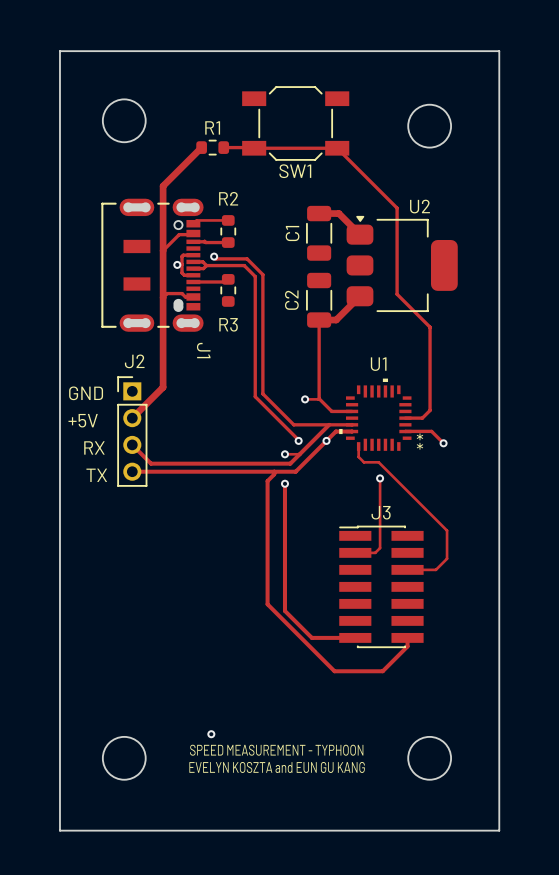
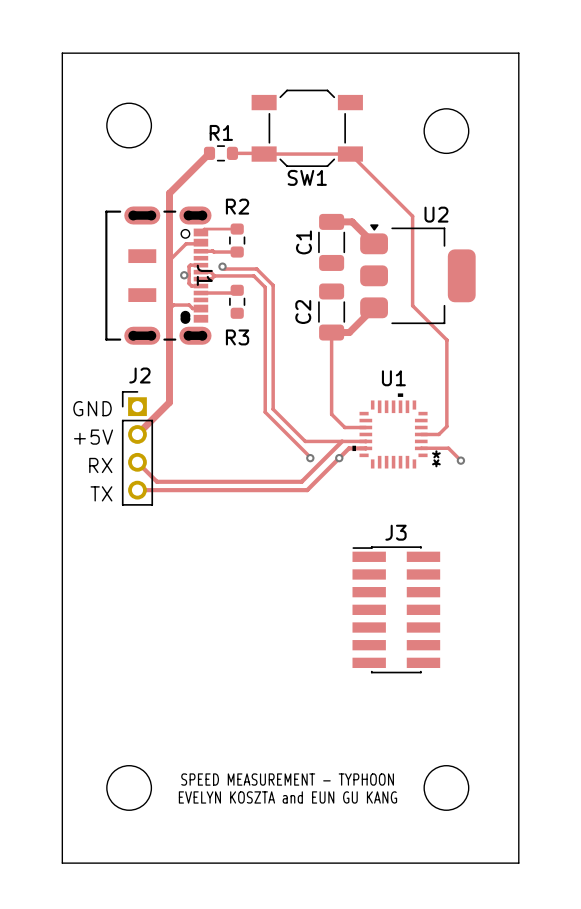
J1 name position: J1 (203, 350) -> J1 (204, 275)
track: (319, 398) (305, 399) -> none
via: (305, 399) -> none
track: (358, 446) (358, 456) (364, 462) (378, 462) (447, 530) (447, 558) (435, 569) (407, 569) -> none
track: (284, 454) (299, 454) -> none
via: (284, 454) -> none
track: (274, 471) (274, 474) (267, 481) (267, 604) (334, 671) (382, 671) (407, 646) (407, 637) -> none
track: (380, 478) (380, 548) (375, 552) (355, 552) -> none
via: (380, 478) -> none
via: (284, 483) -> none
track: (284, 485) (284, 610) (311, 637) (355, 637) -> none
via: (211, 734) -> none

